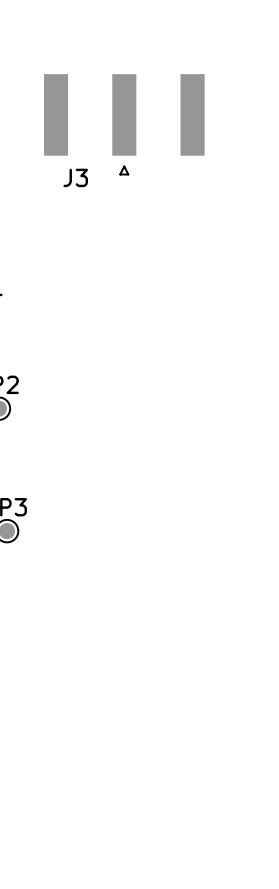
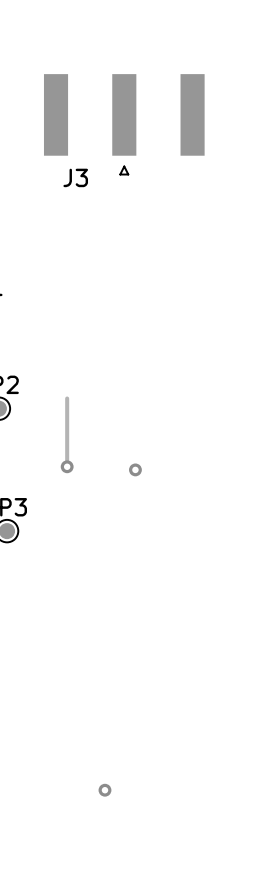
track: none -> (67, 398) (67, 466)
via: none -> (67, 466)
via: none -> (135, 469)
via: none -> (104, 790)

